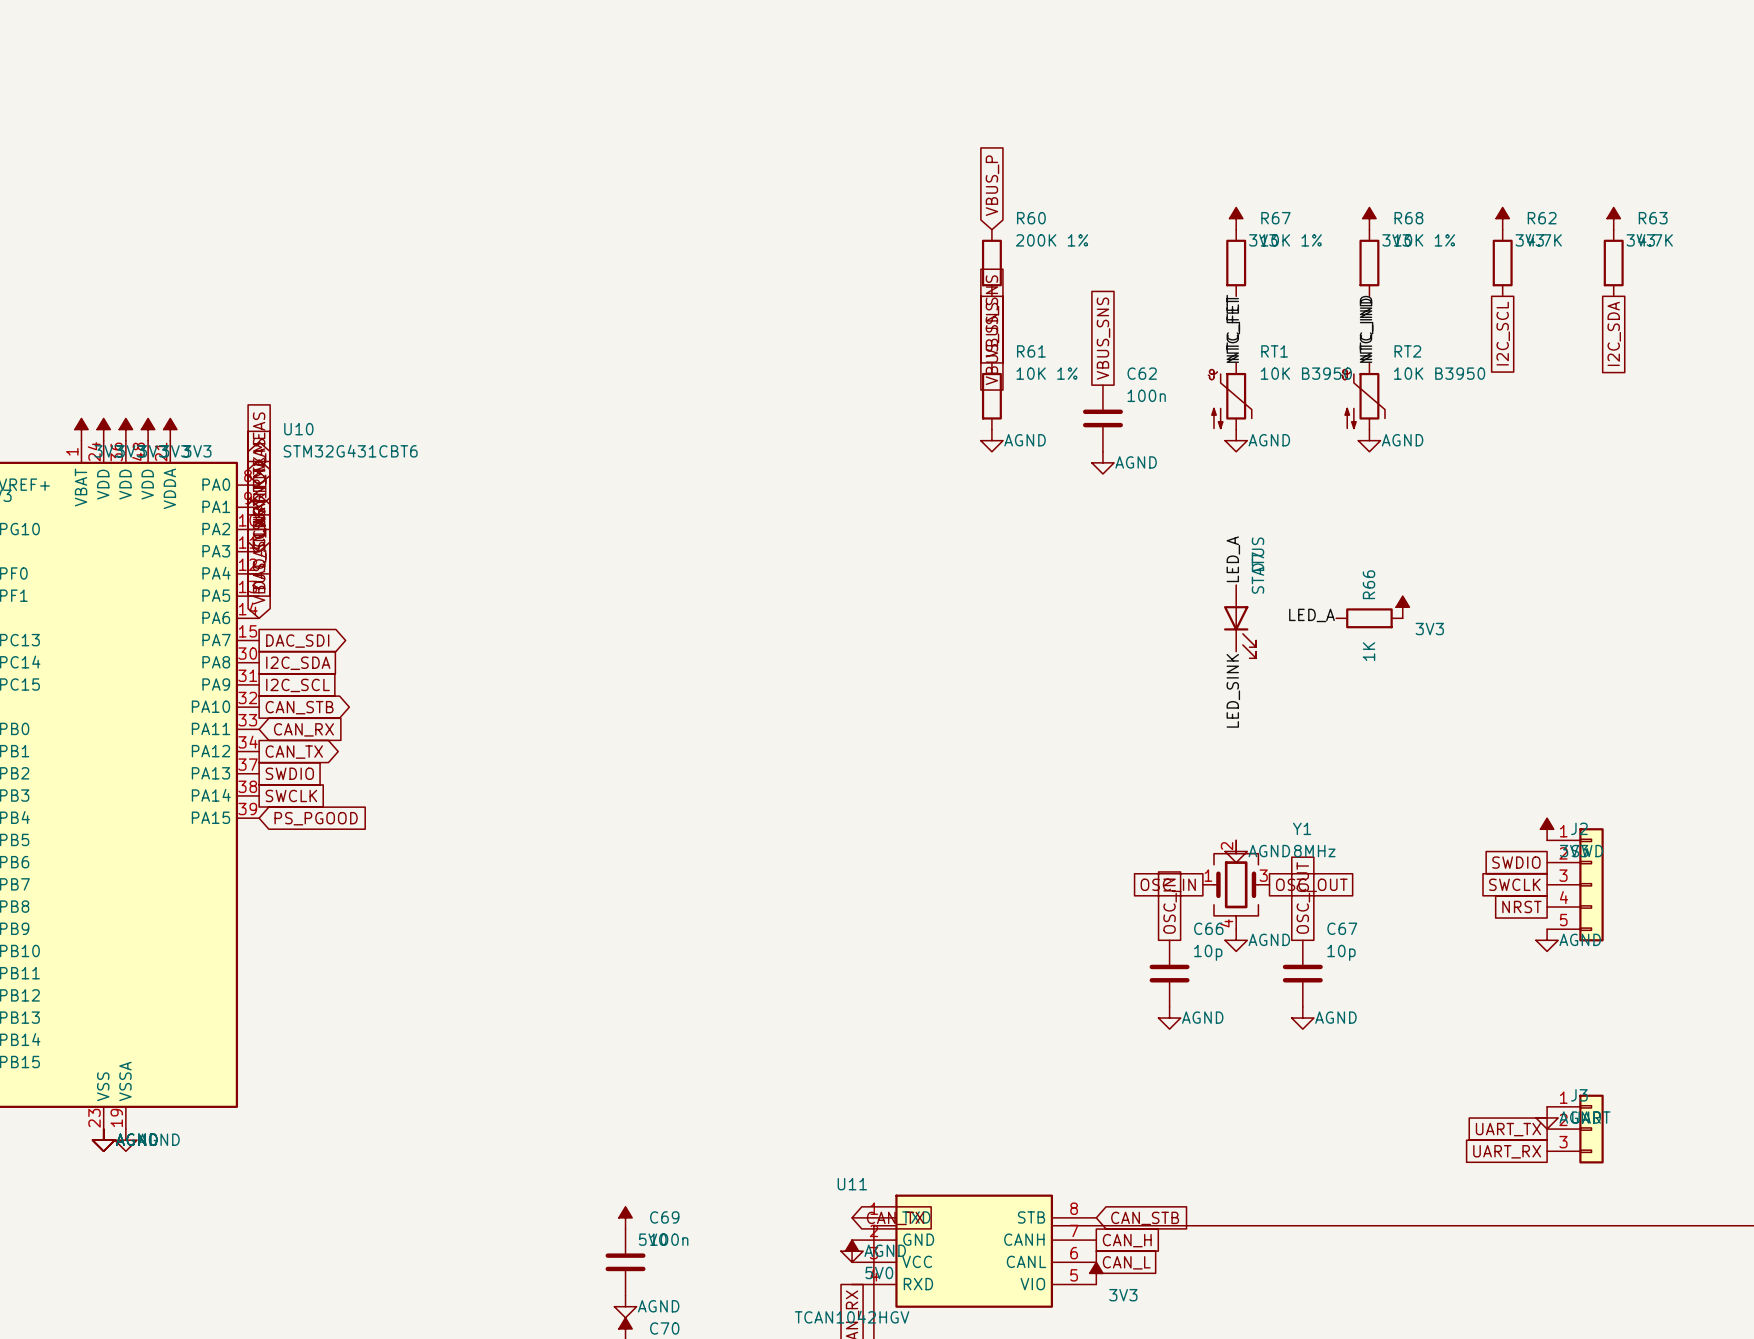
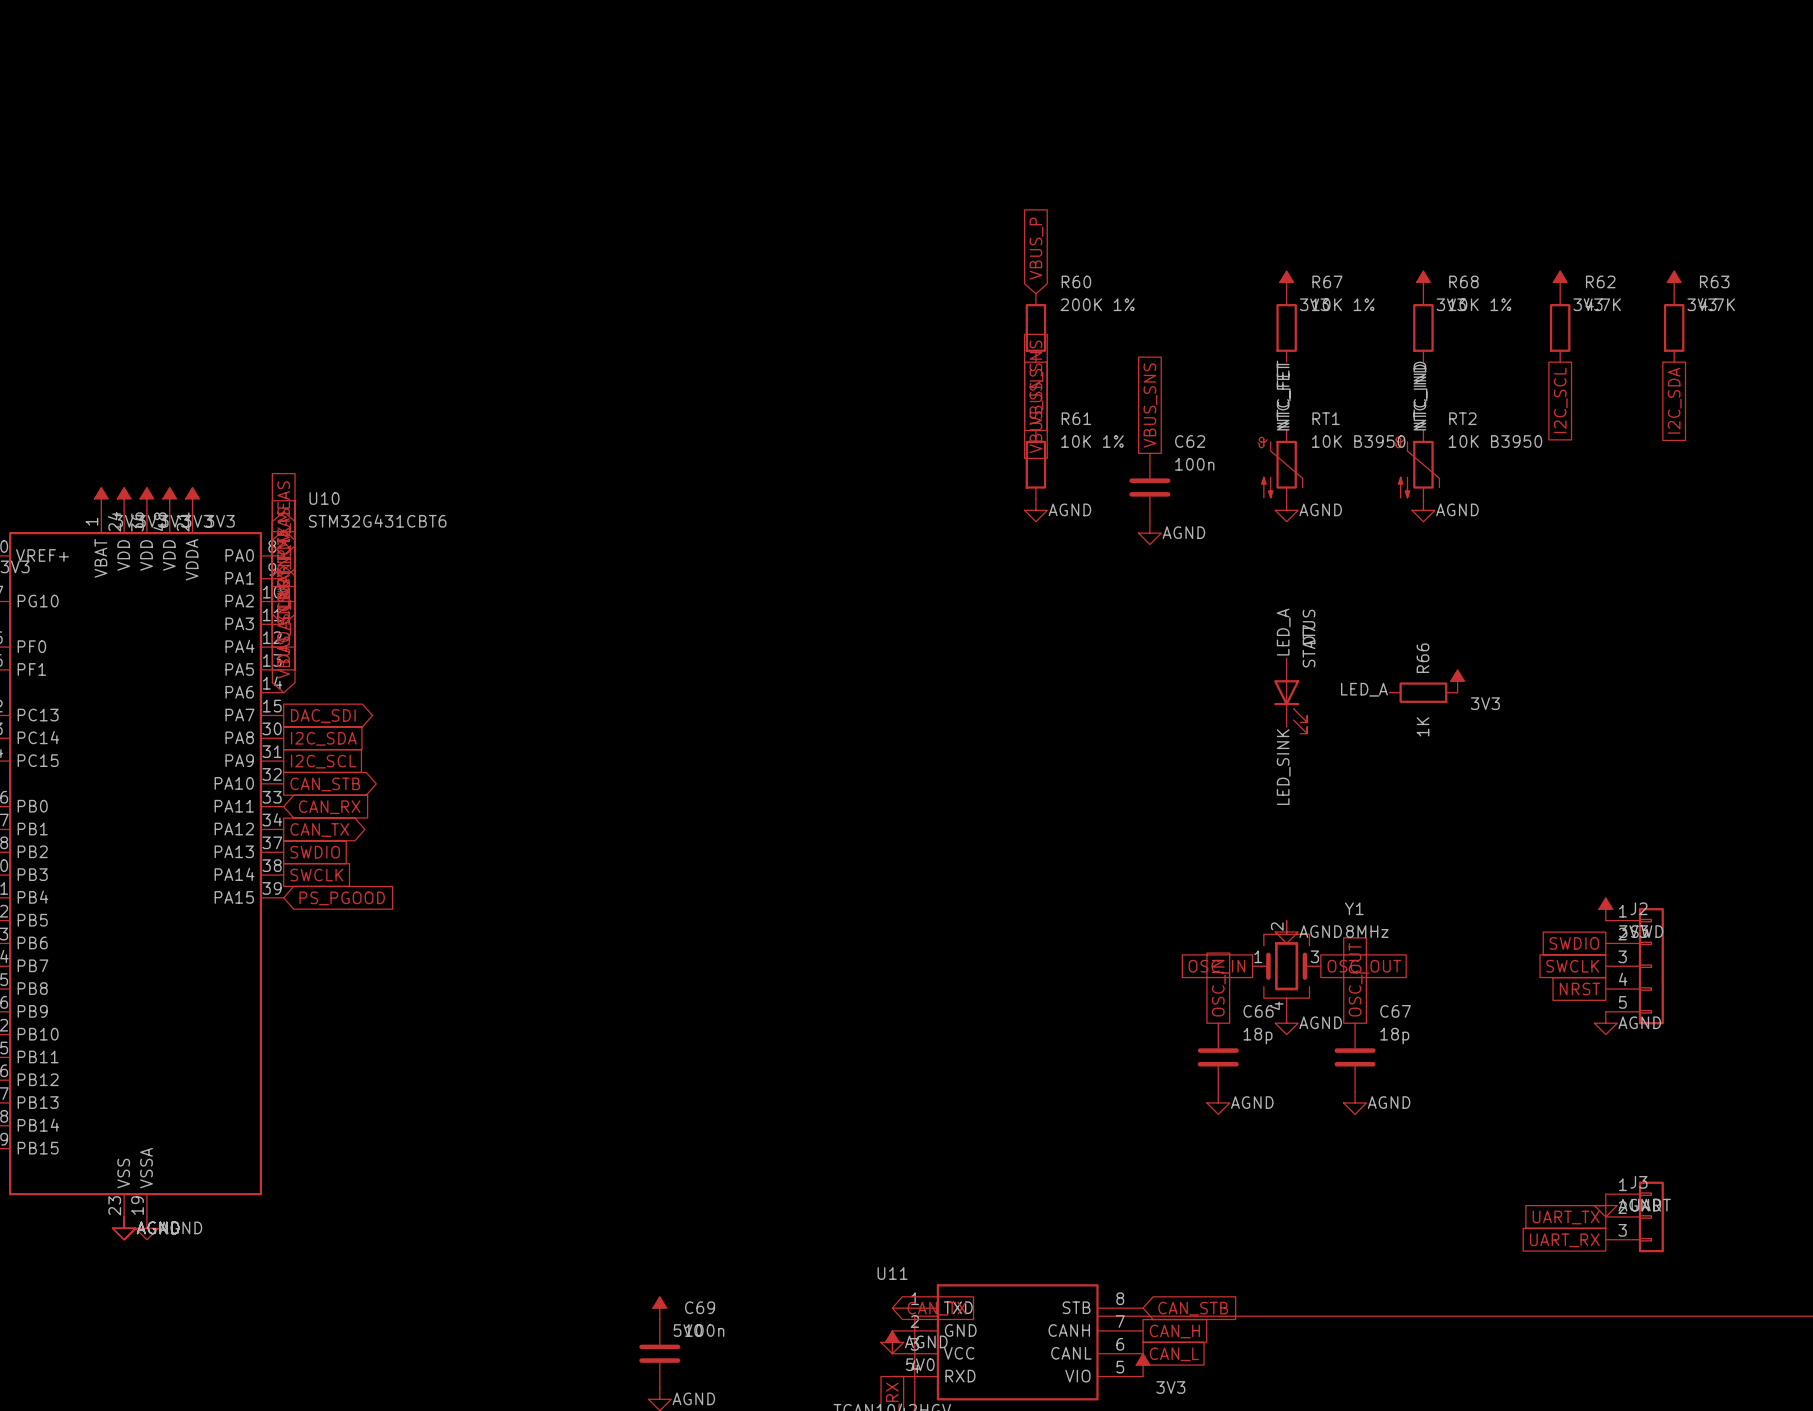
C66 value: 10p (1208, 952) -> 18p (1257, 1036)
C67 value: 10p (1341, 952) -> 18p (1394, 1036)

